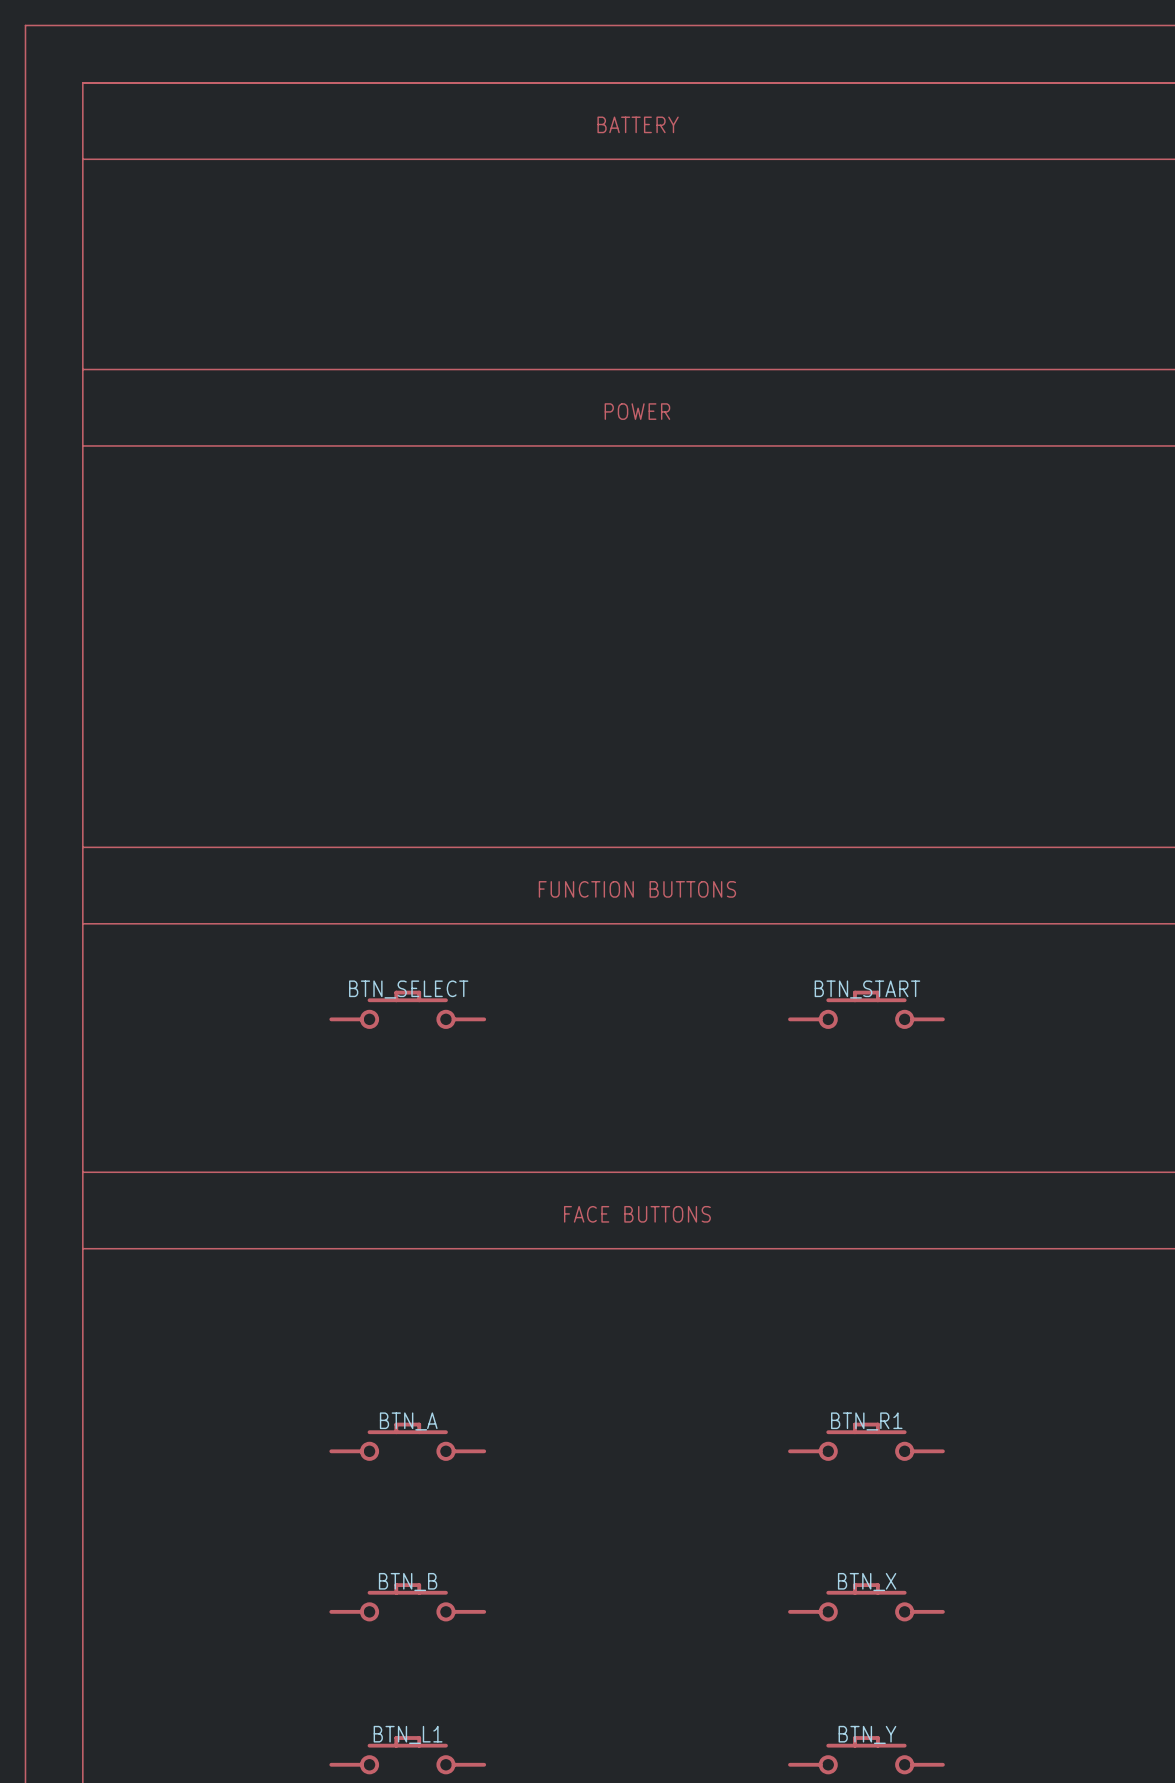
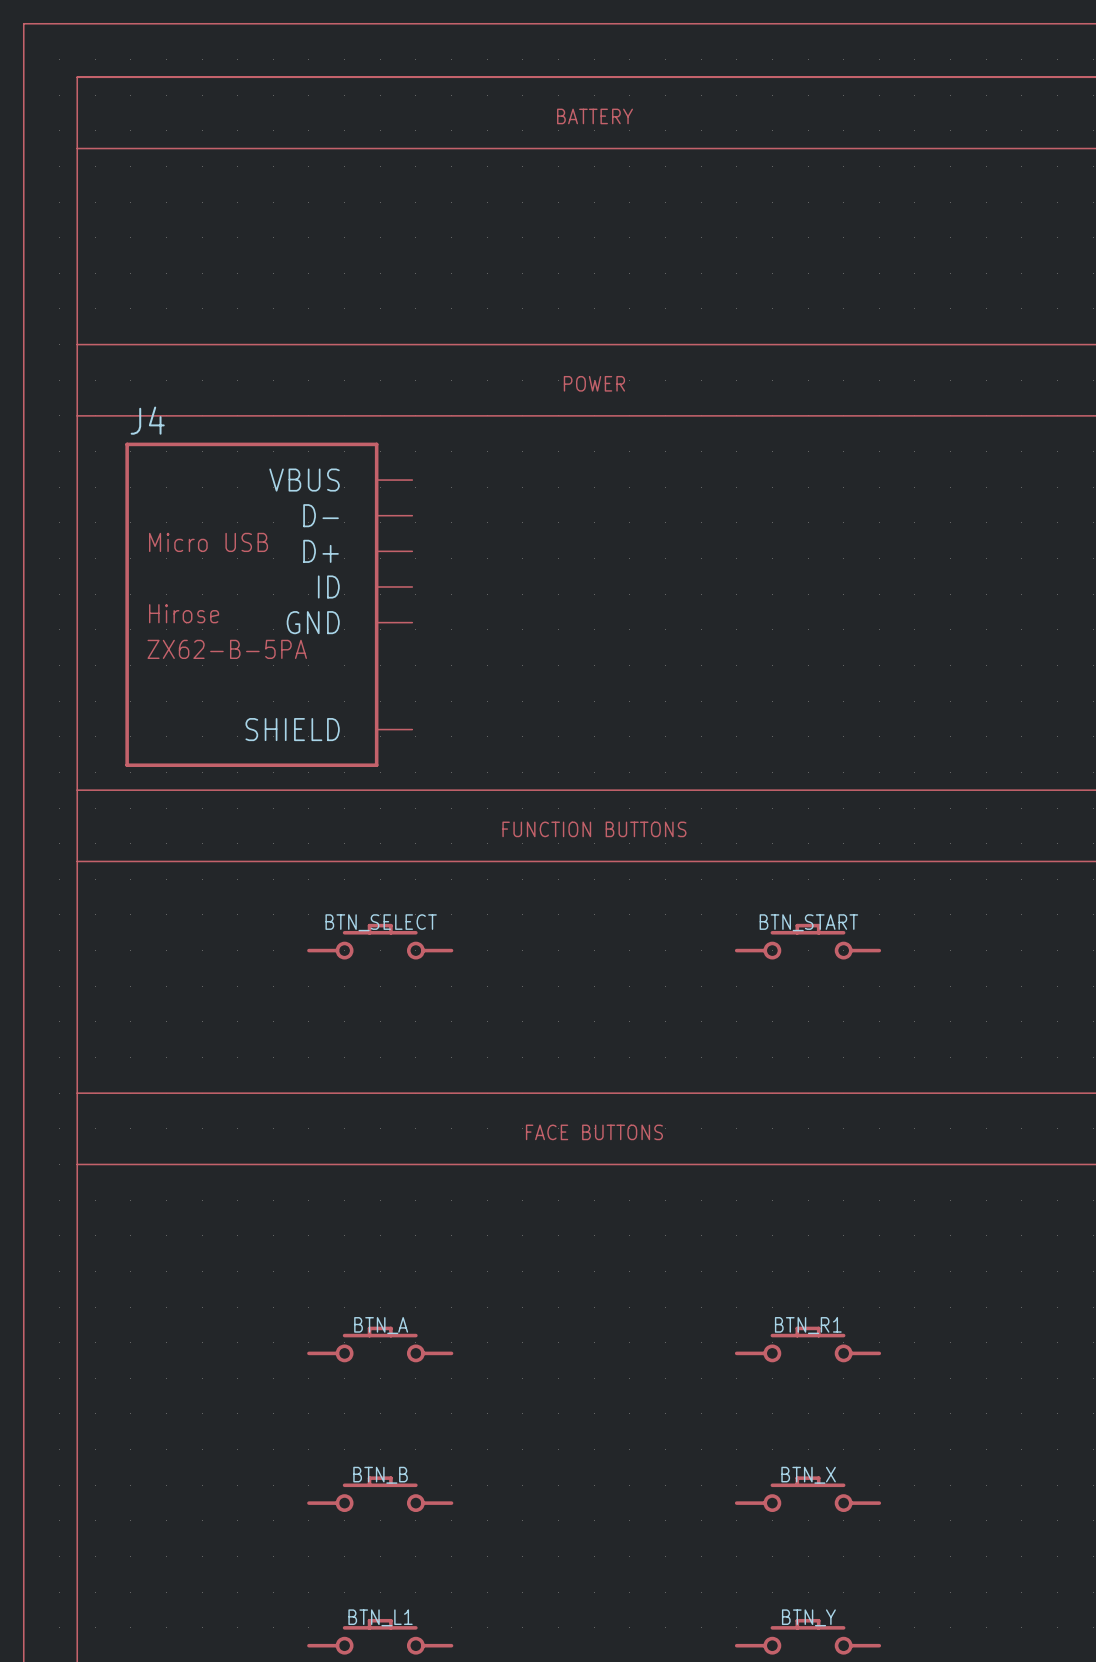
J4: none -> (268, 604)

